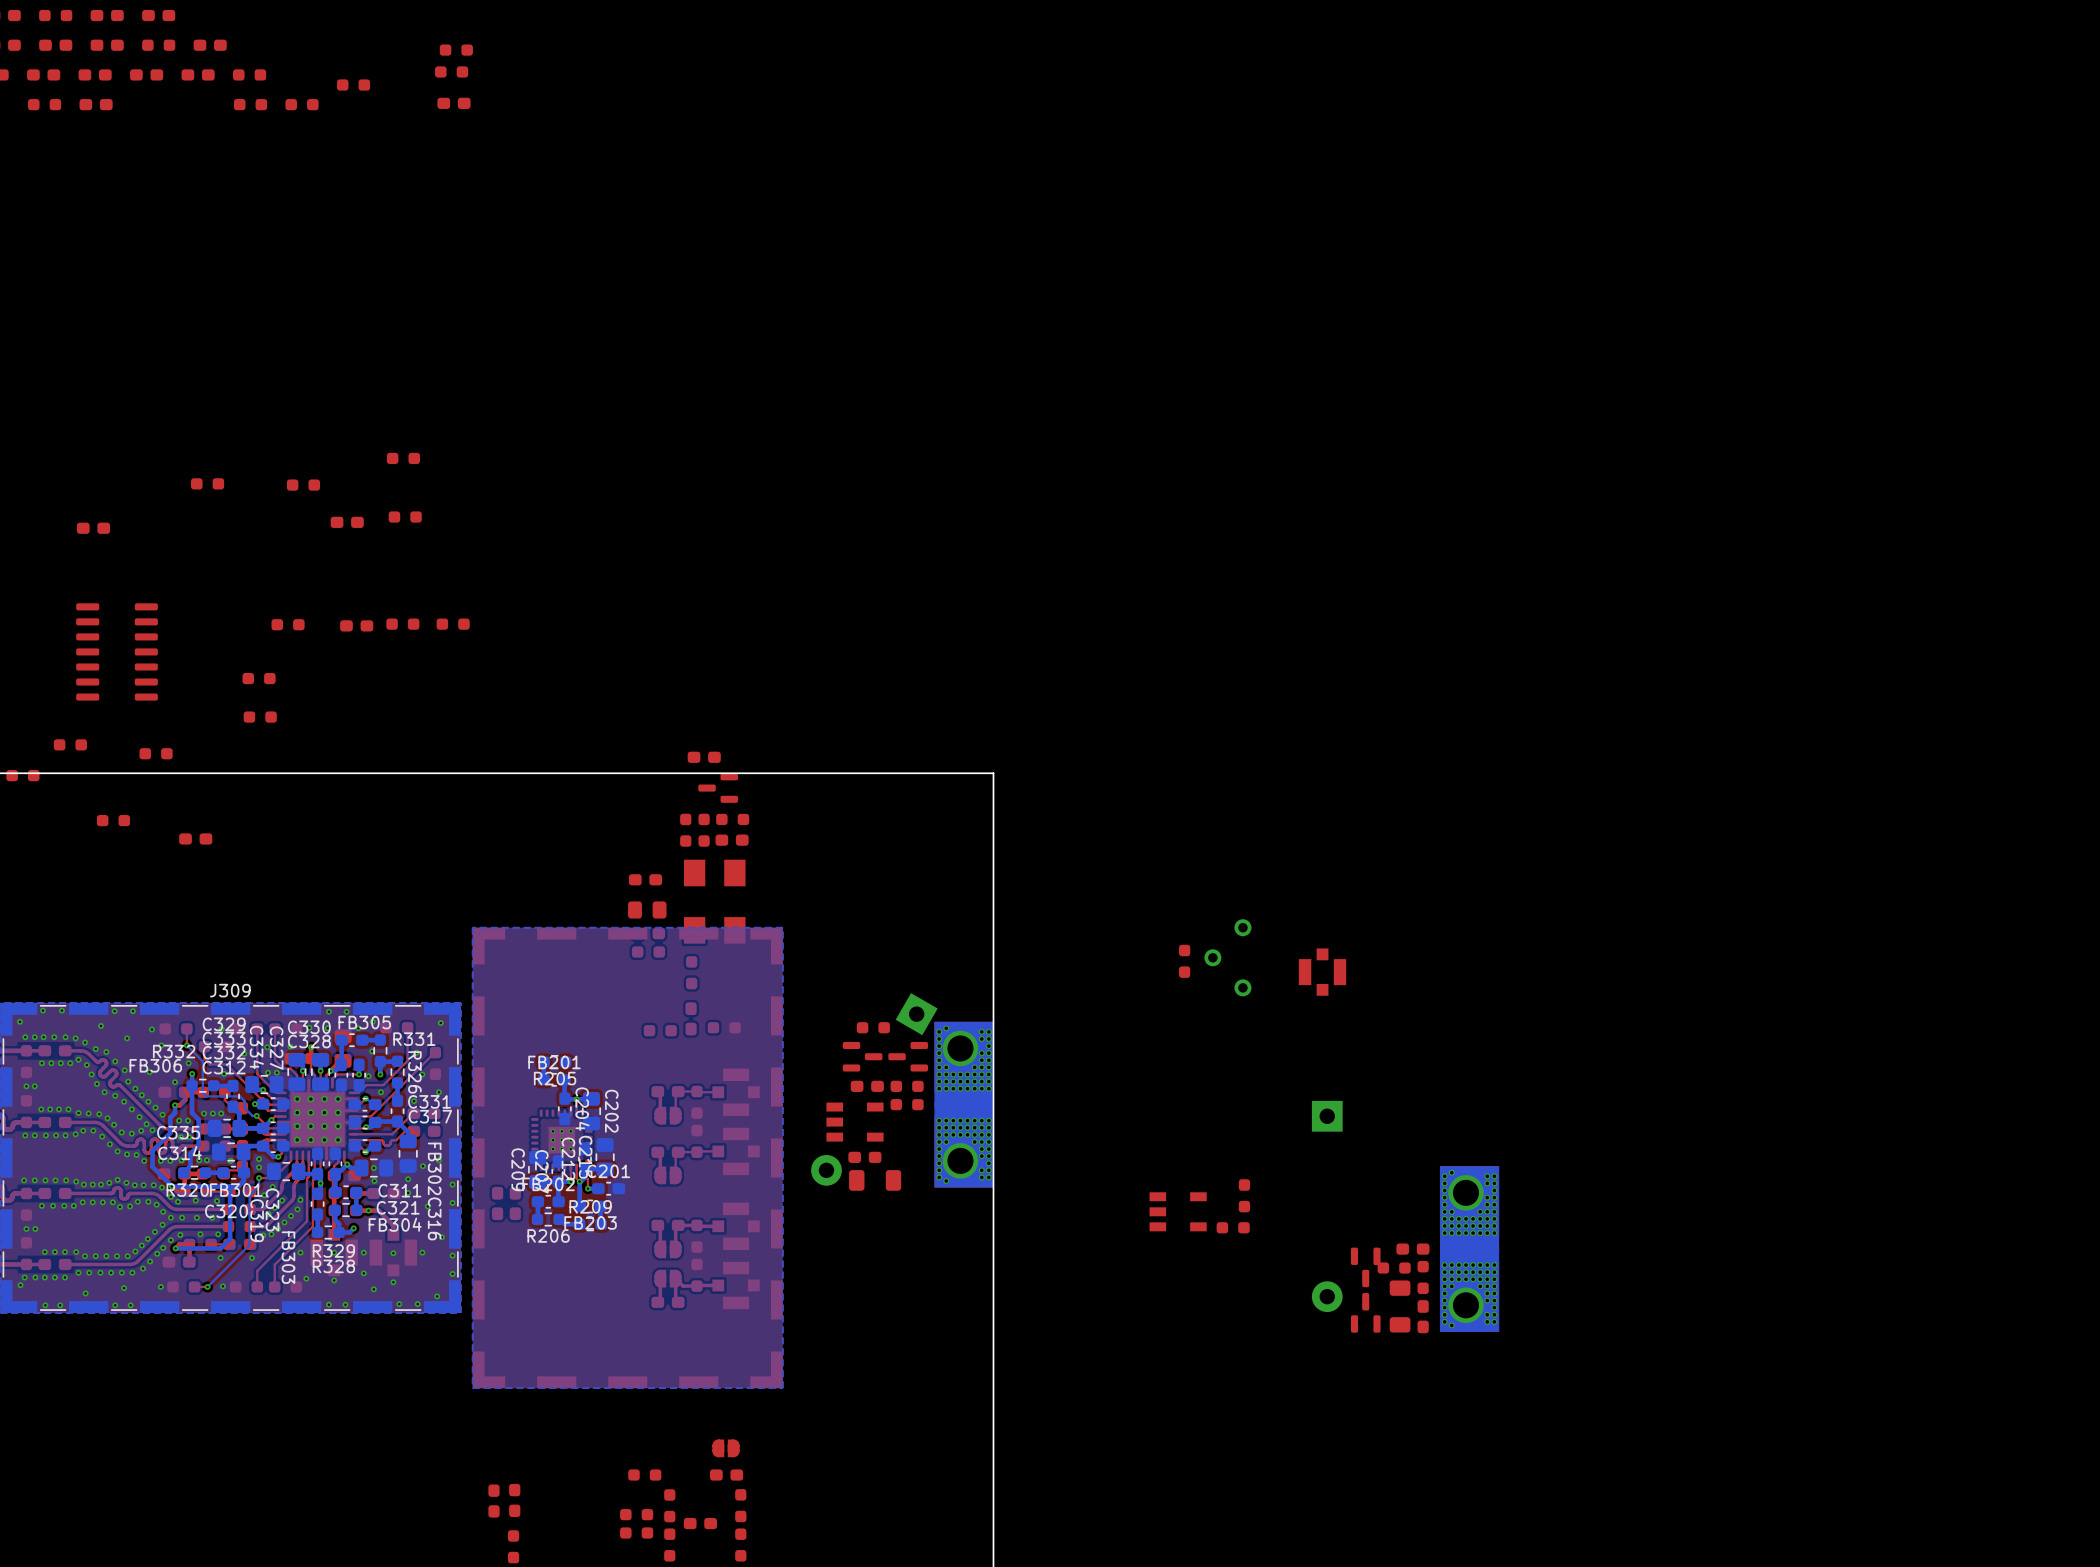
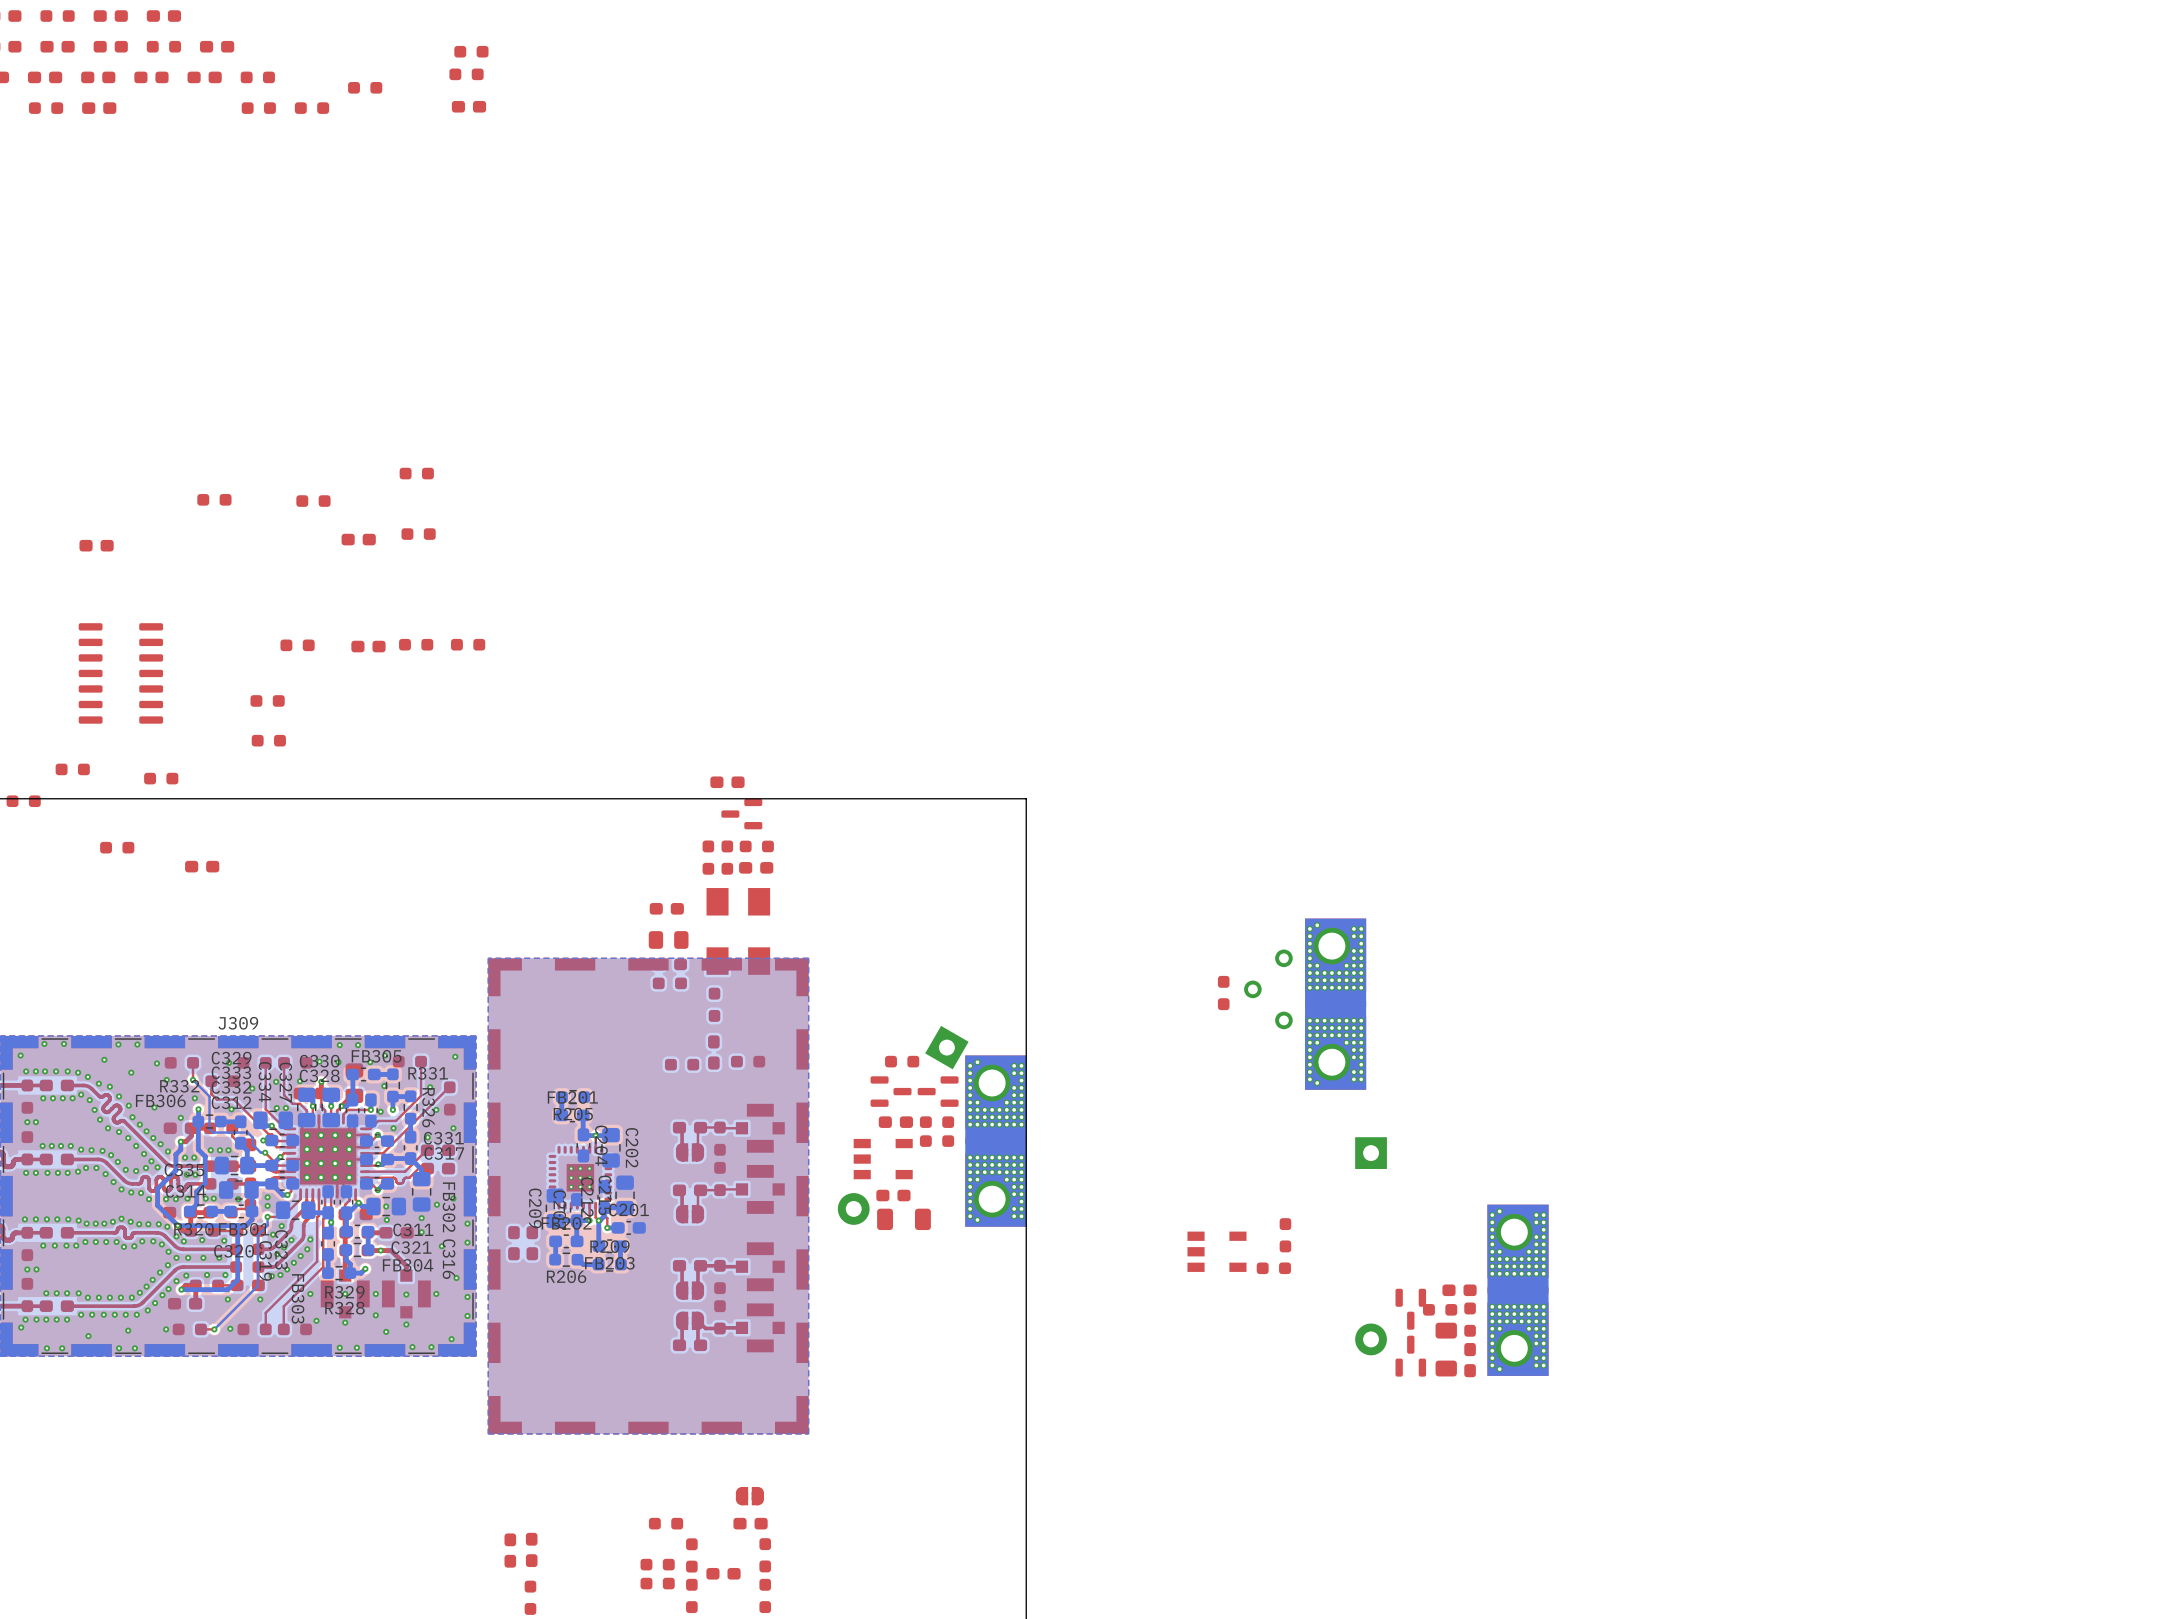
part: none -> (1335, 1004)
part: (1322, 972) -> none

